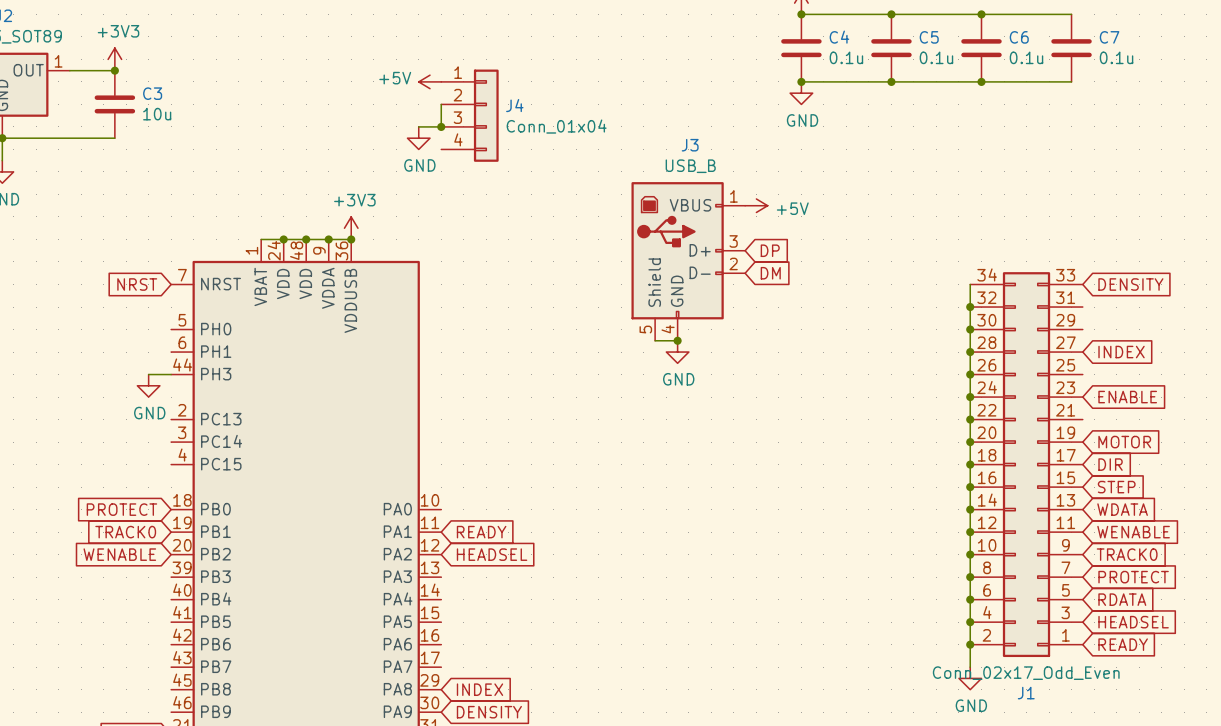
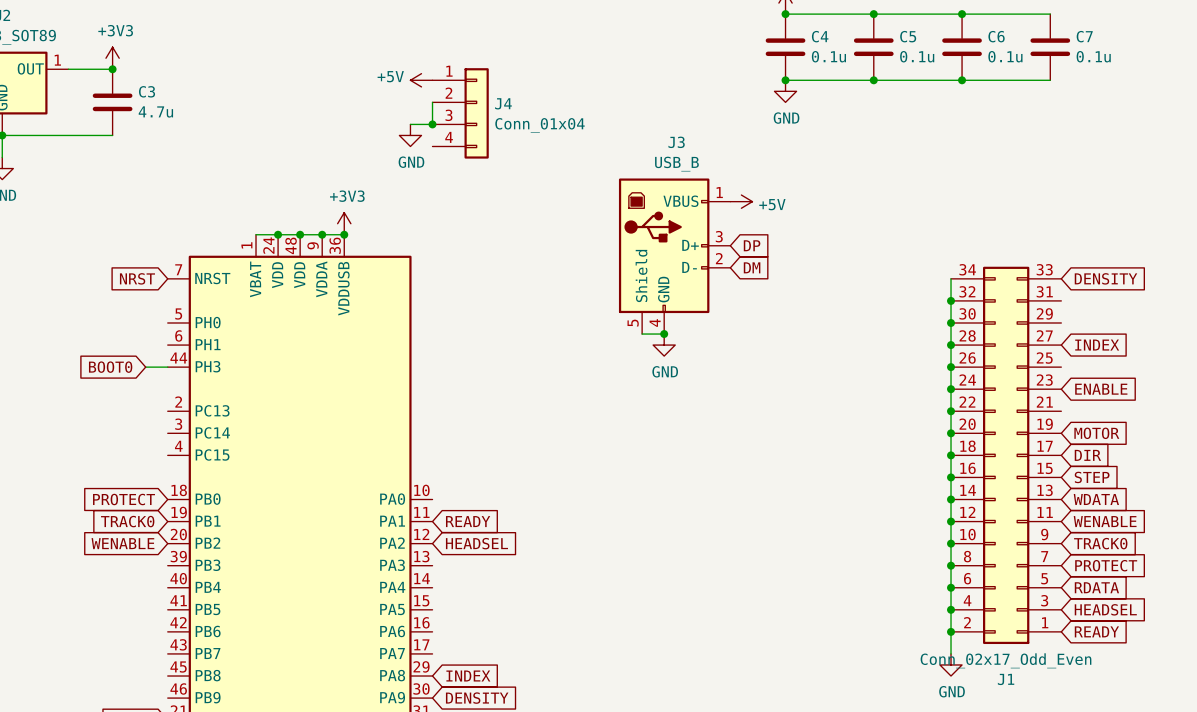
C3 value: 10u (157, 114) -> 4.7u (155, 111)
global label: none -> BOOT0 (110, 367)
power symbol: GND (148, 385) -> none

